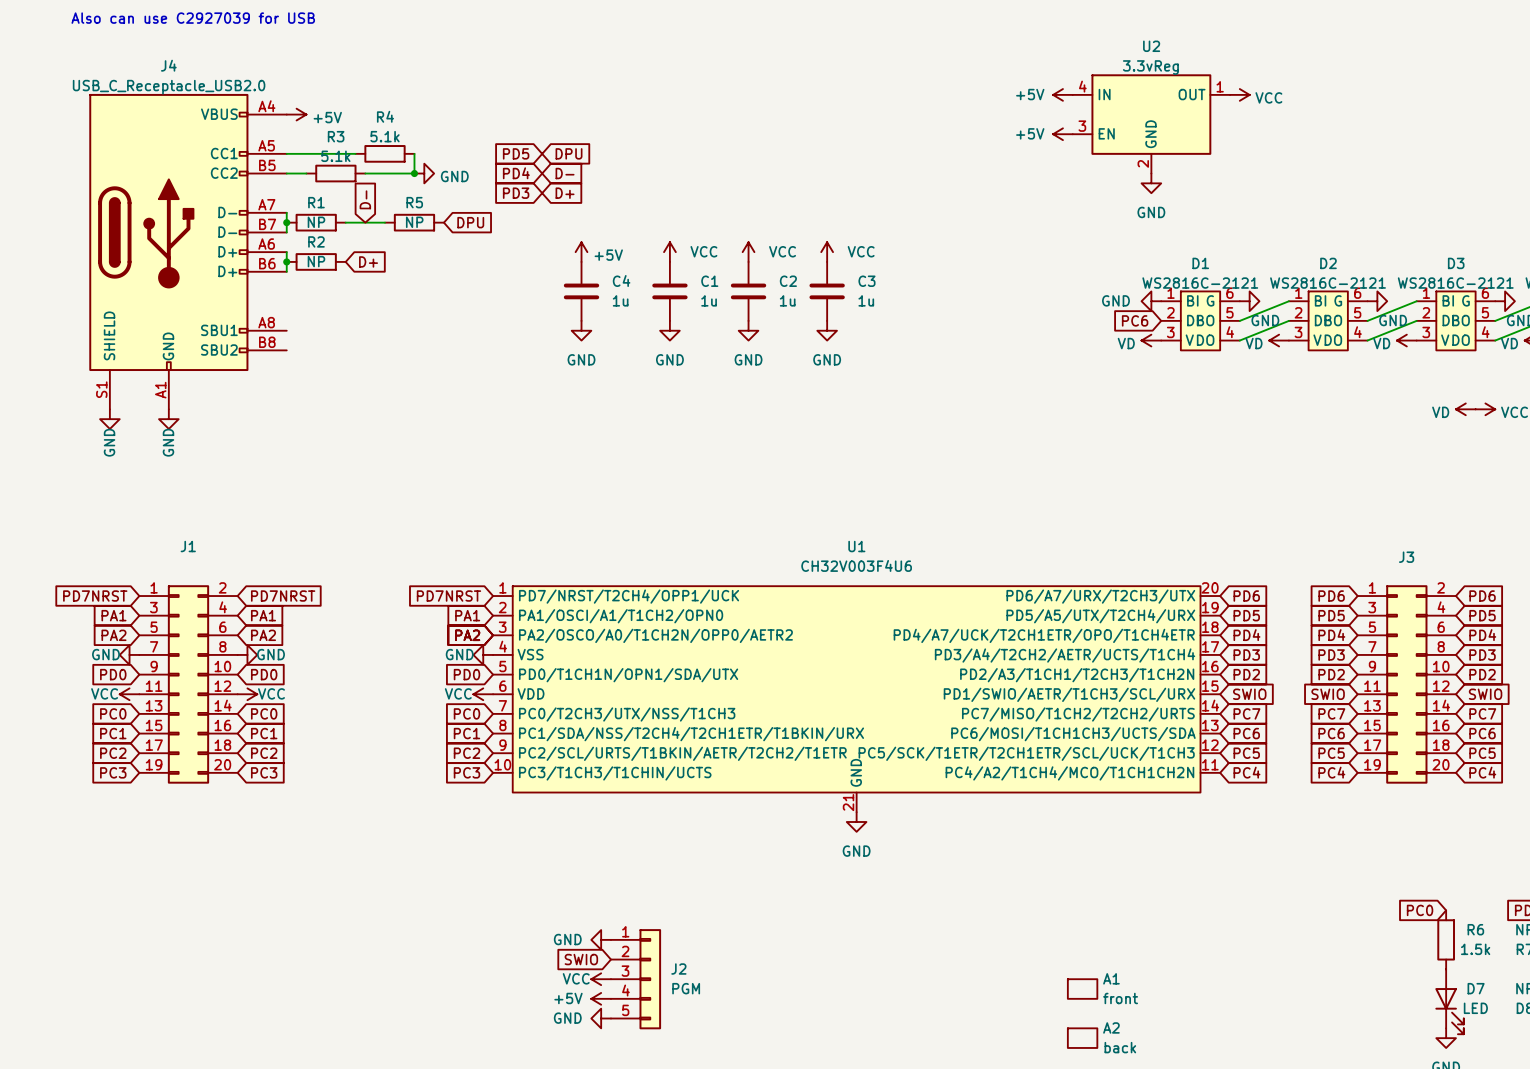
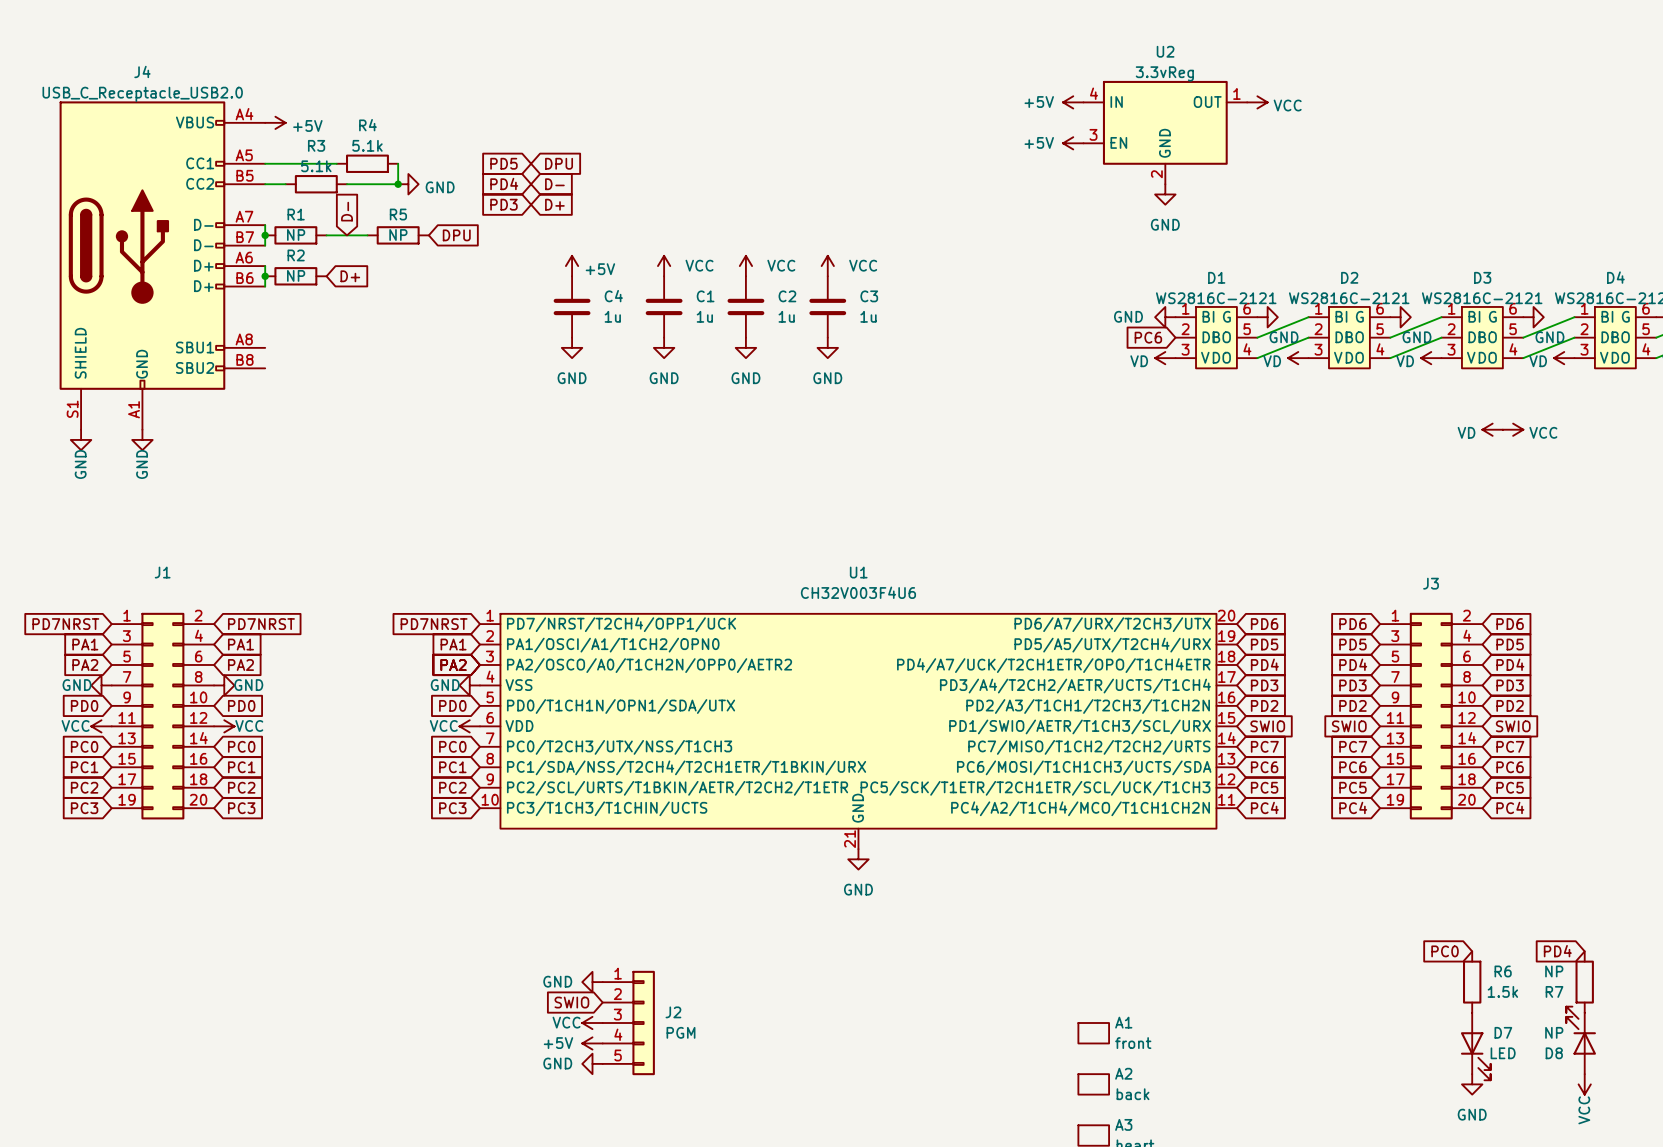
text: Also can use C2927039 for USB (193, 18) -> none

